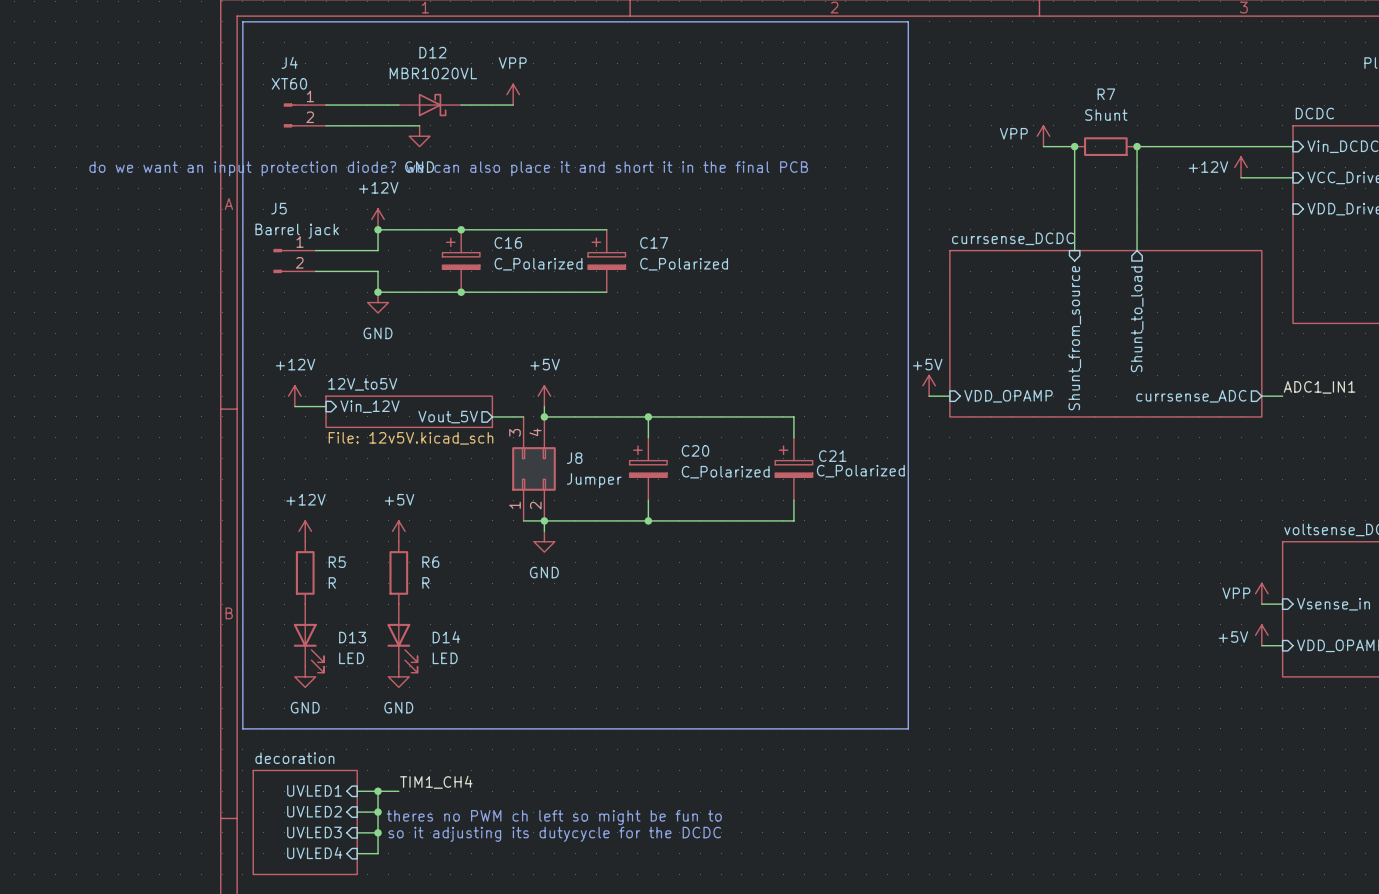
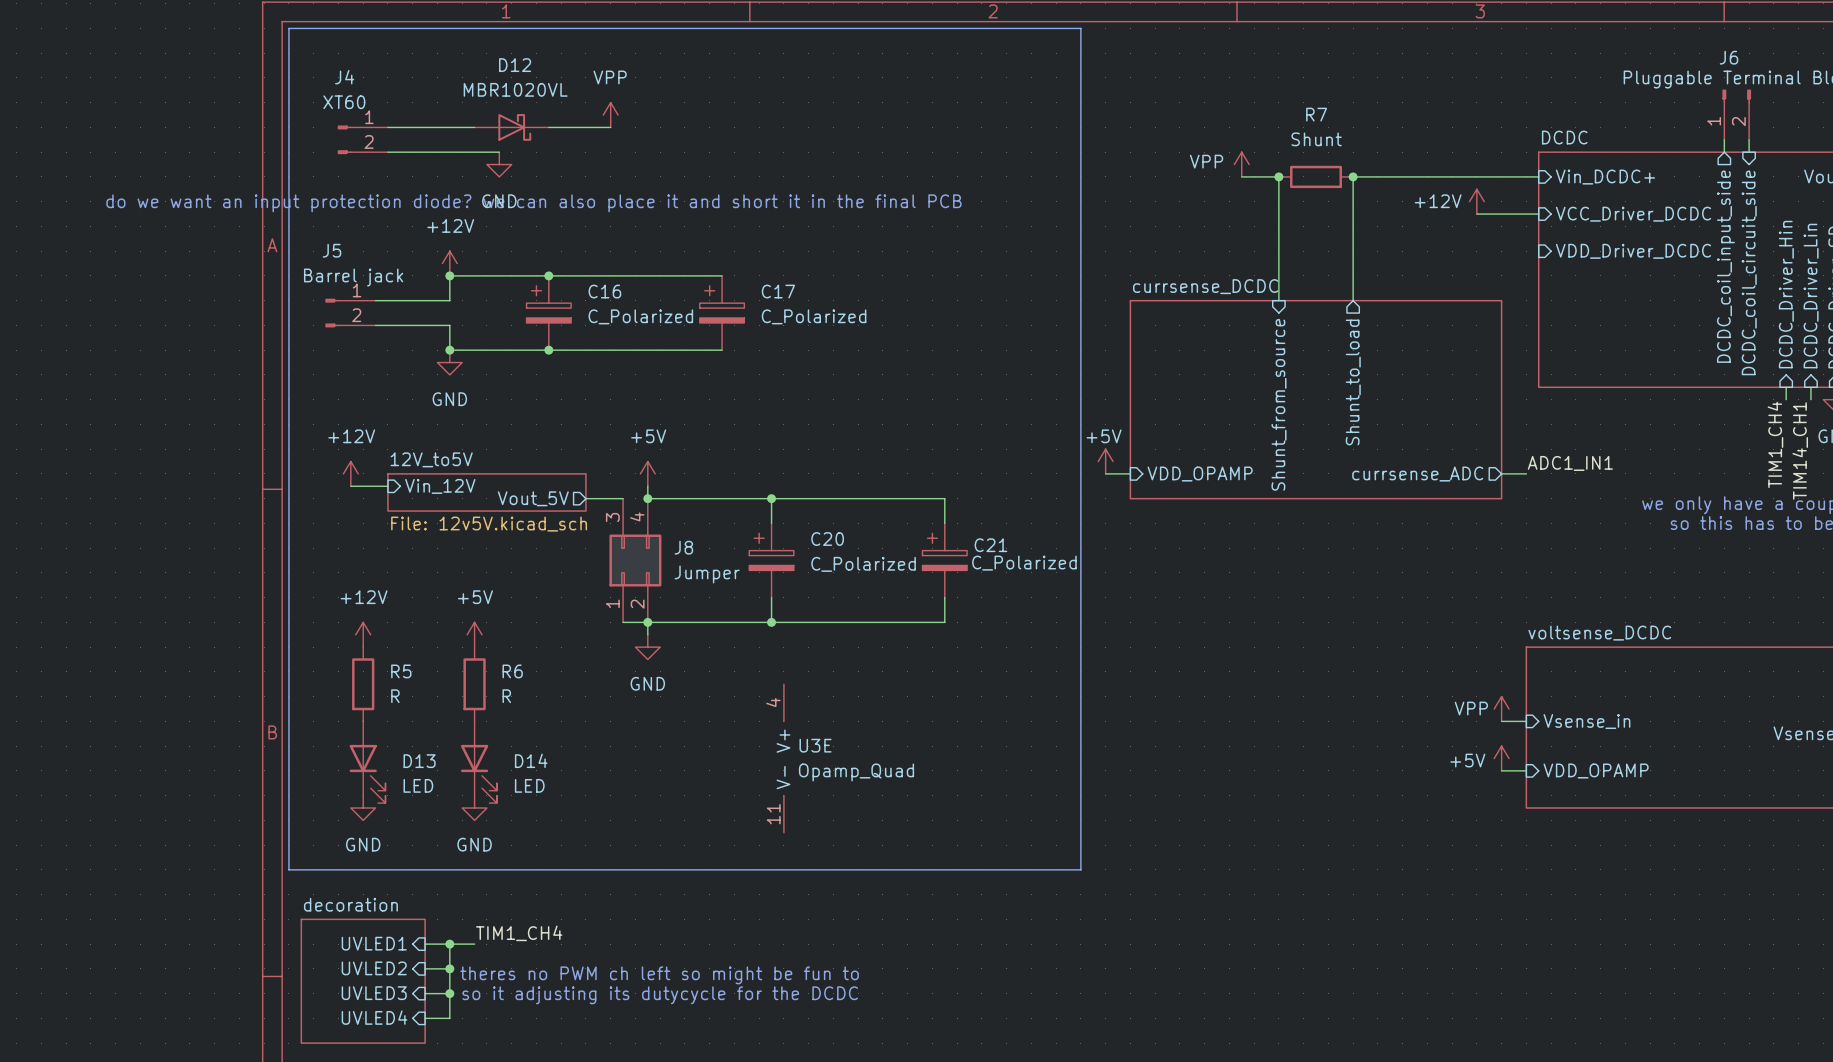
U3E: none -> Opamp_Quad (783, 758)

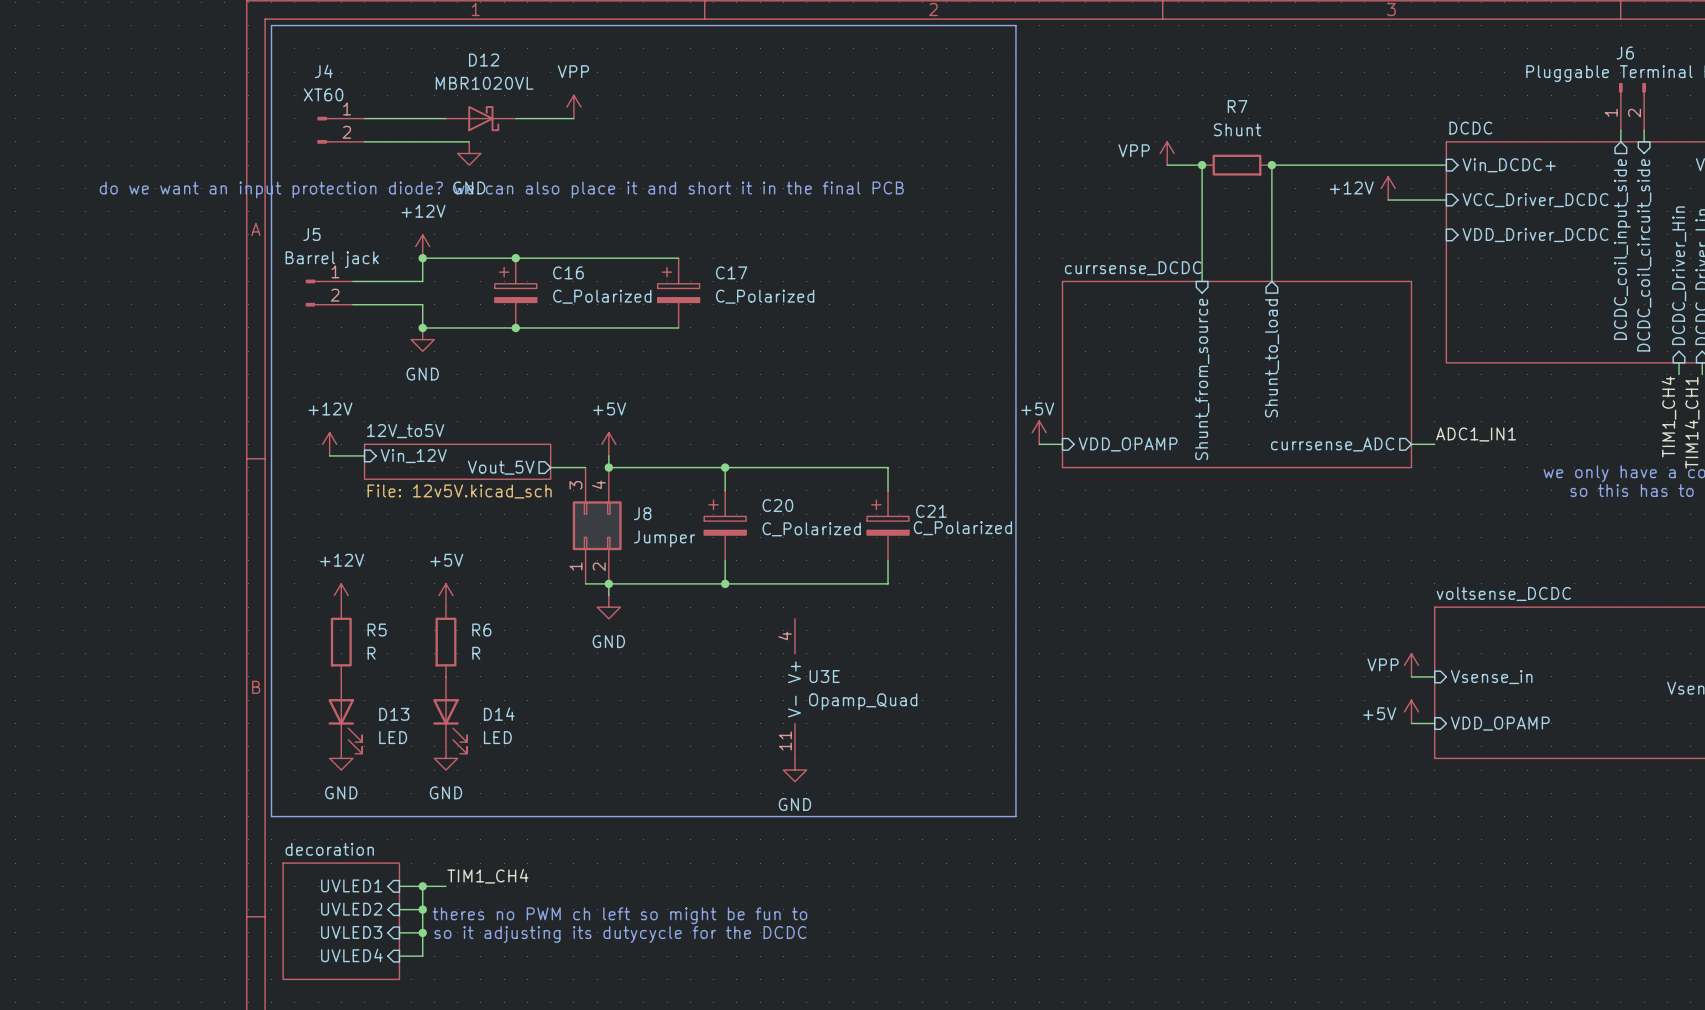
U3E position: (783, 758) -> (794, 688)
power symbol: none -> GND (794, 770)

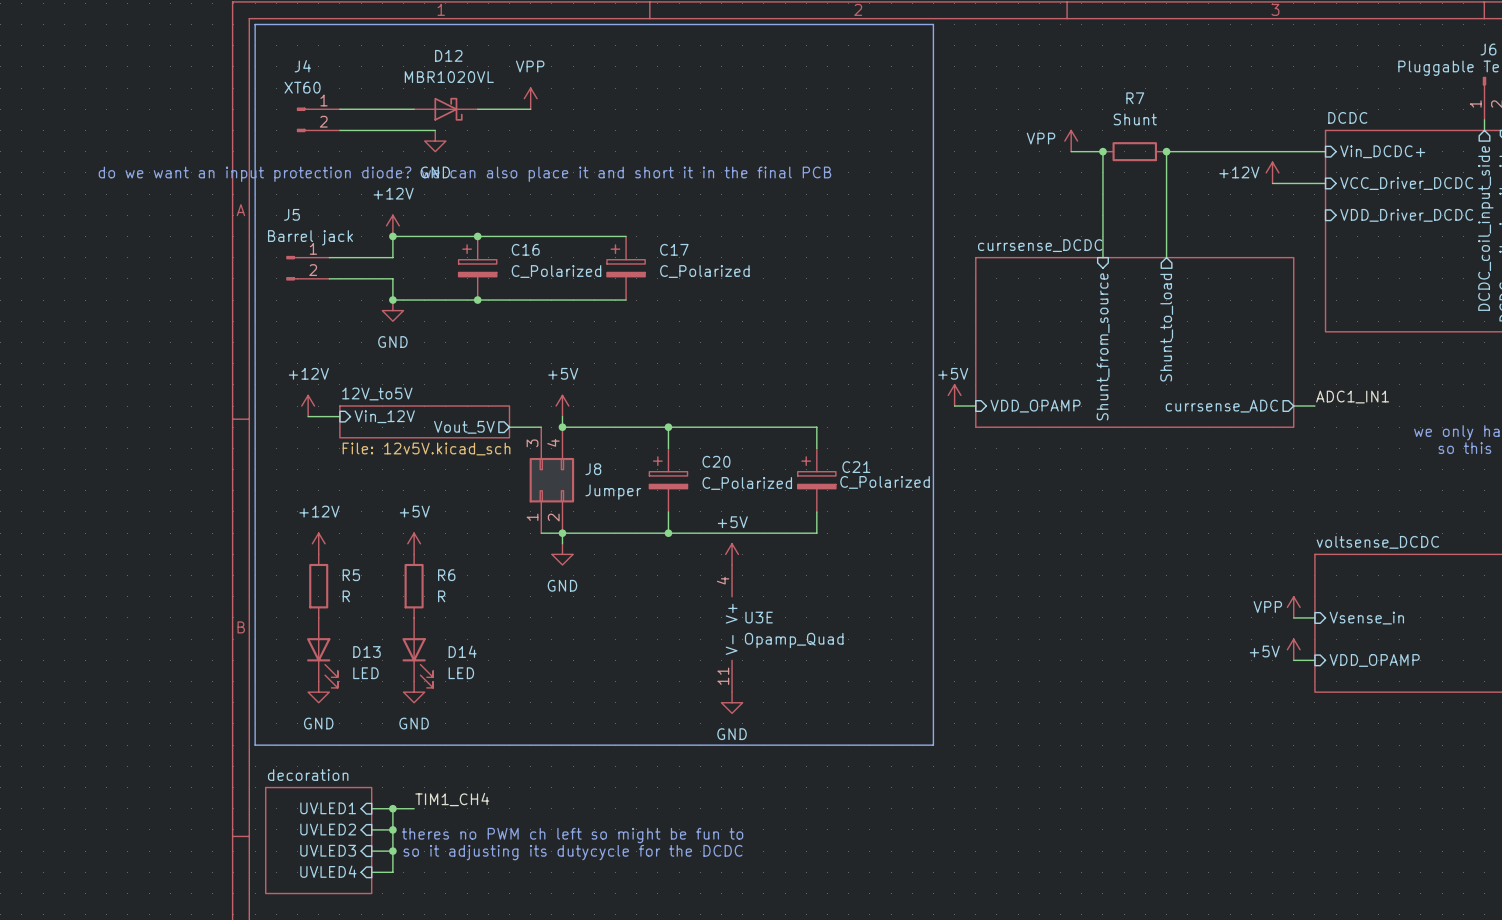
power symbol: none -> +5V (732, 554)

